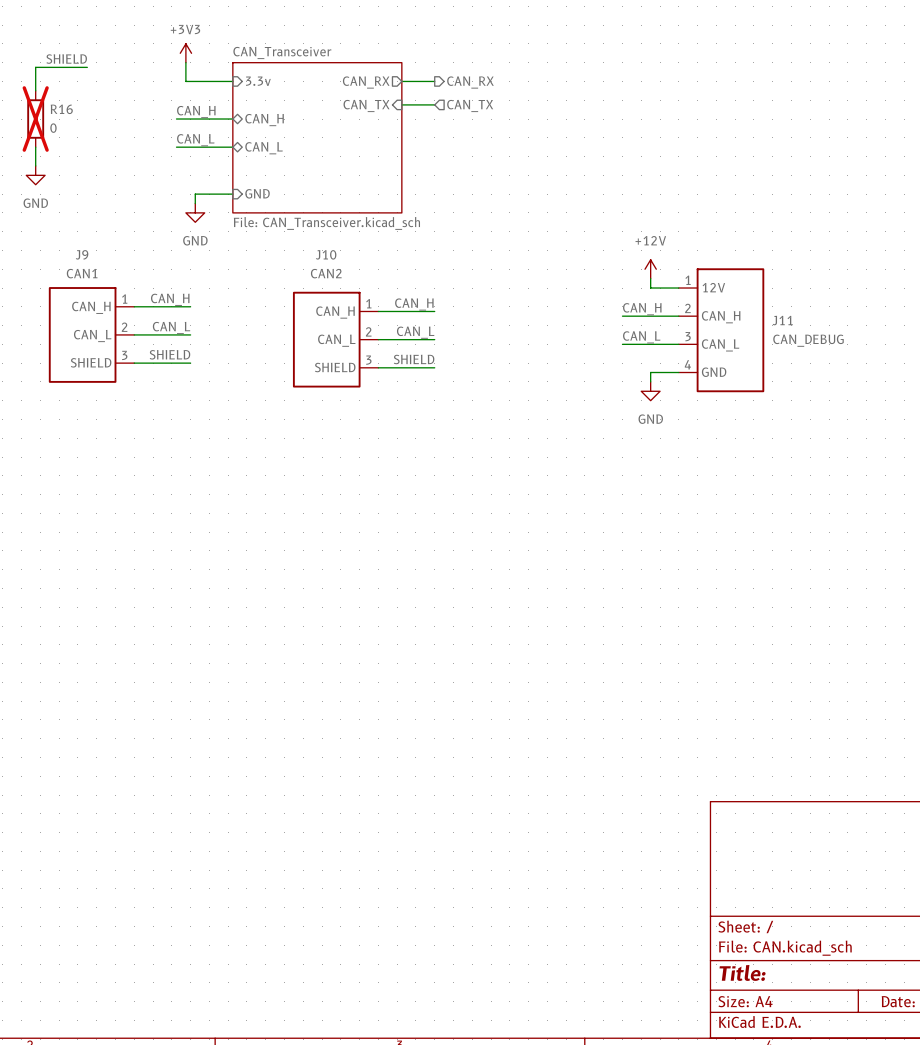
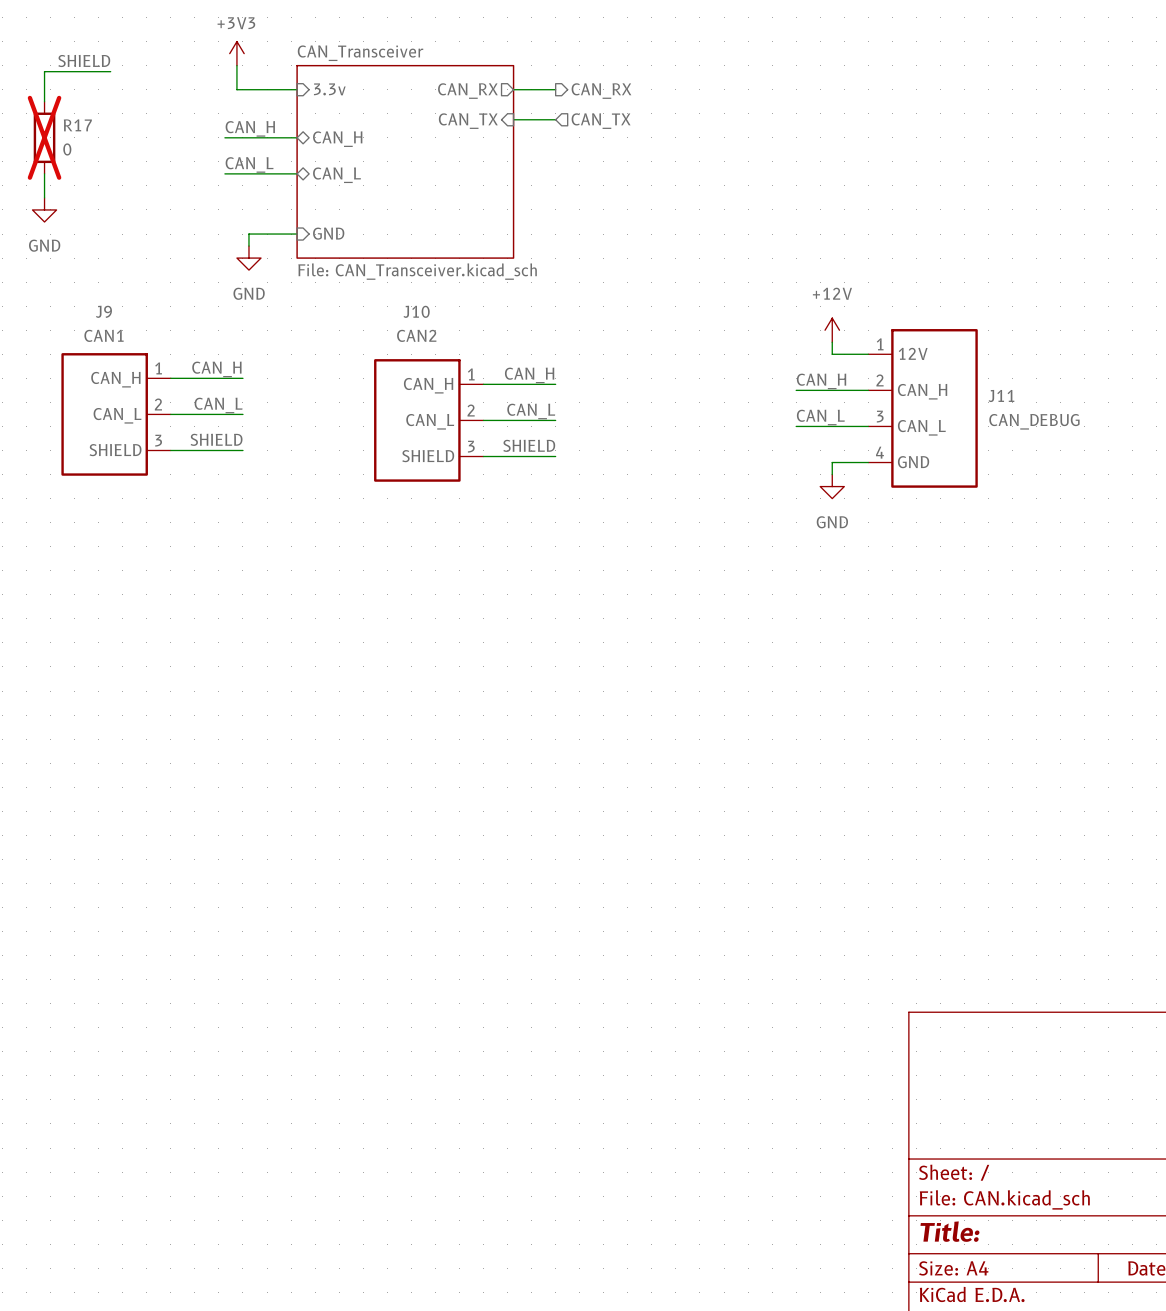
R16 name: R16 (61, 109) -> R17 (77, 125)

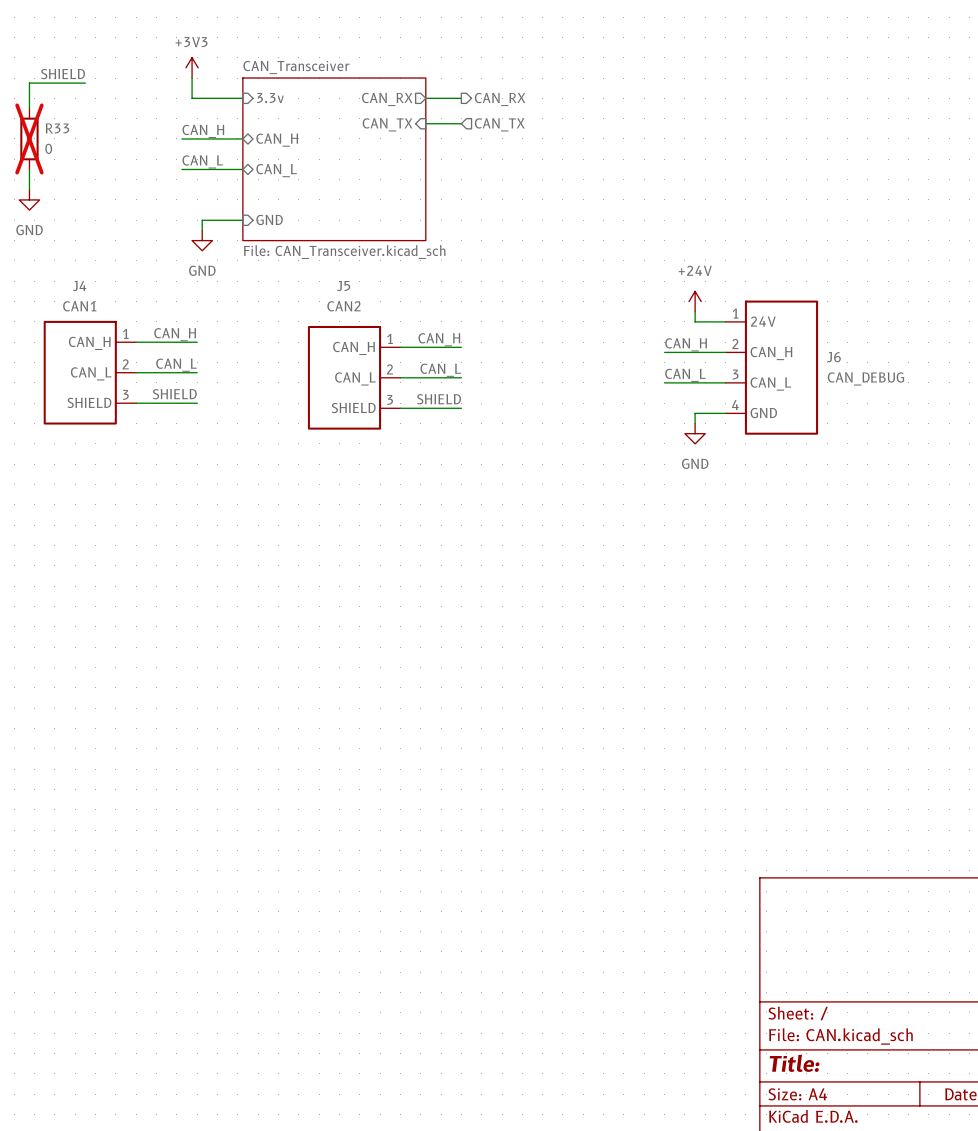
R17 name: R17 (77, 125) -> R33 (57, 128)
J9 name: J9 (103, 311) -> J4 (79, 286)
J10 name: J10 (416, 311) -> J5 (343, 286)
power symbol: +12V (832, 330) -> +24V (695, 301)
J11 pin name: 12V (913, 353) -> 24V (763, 321)
J11 name: J11 (1001, 395) -> J6 (834, 357)

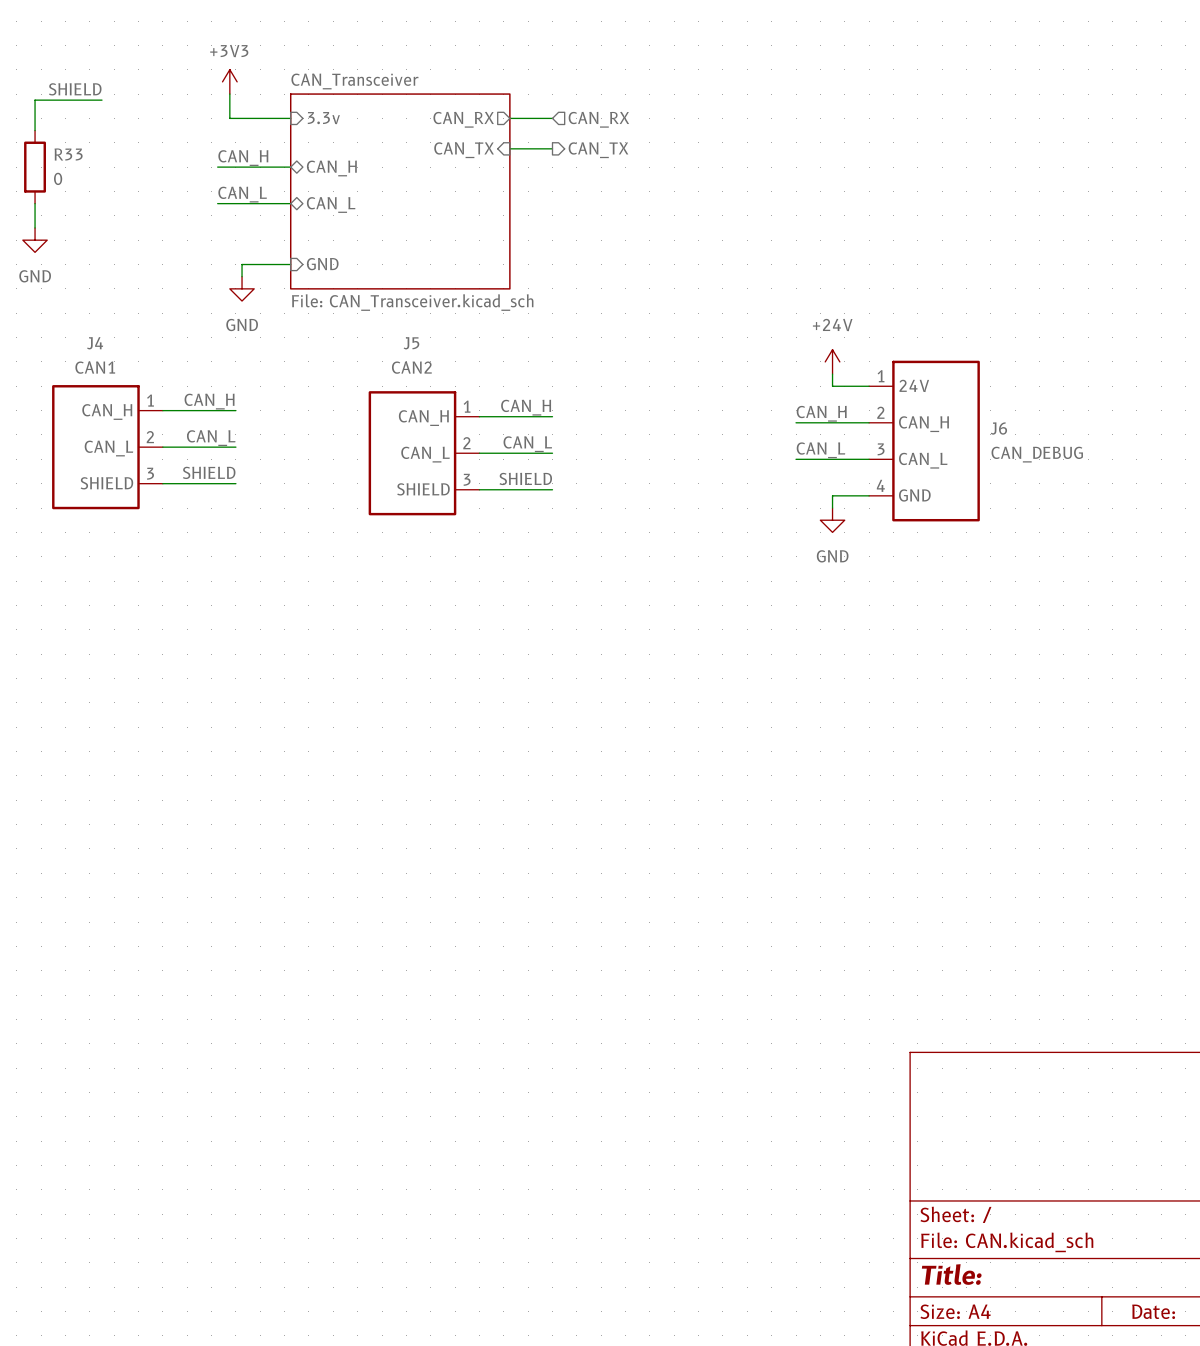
hierarchical label shape: output (500, 99) -> input (598, 119)
hierarchical label shape: input (499, 124) -> output (598, 150)
R33 do-not-place cross: (29, 138) -> none

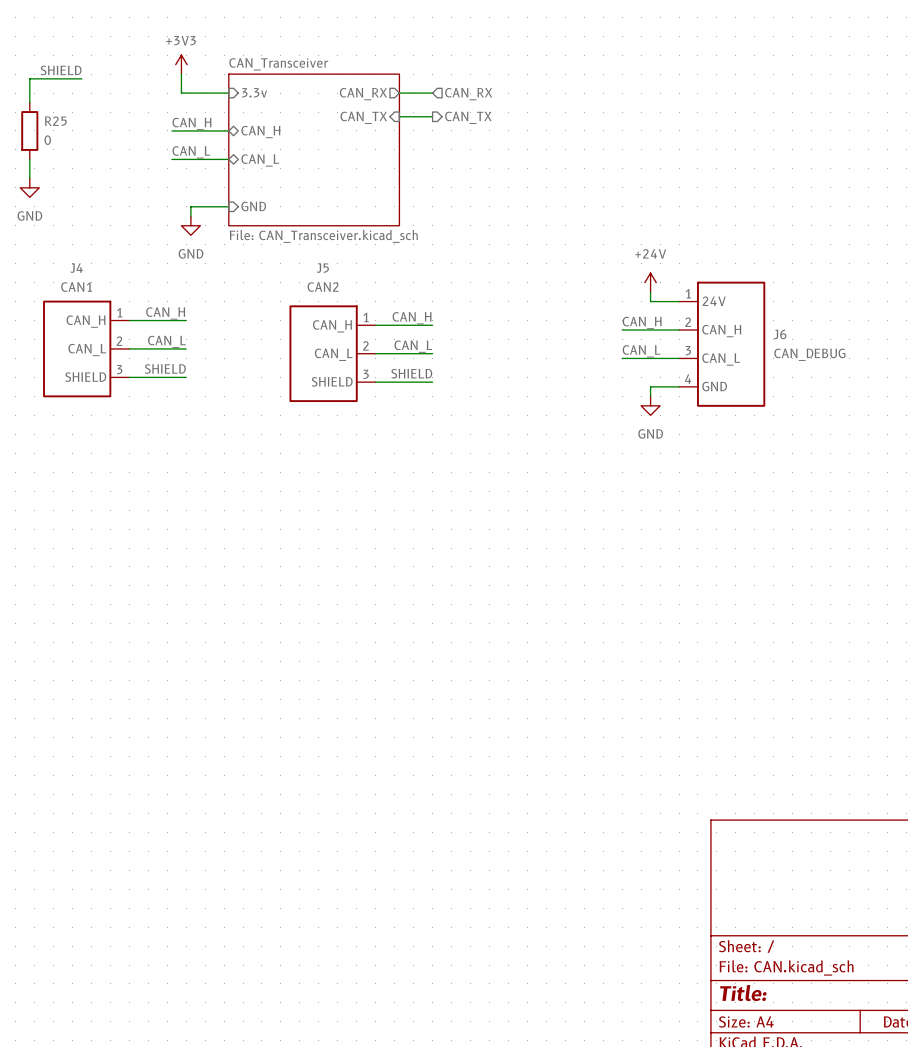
R33 name: R33 (68, 154) -> R25 (55, 121)

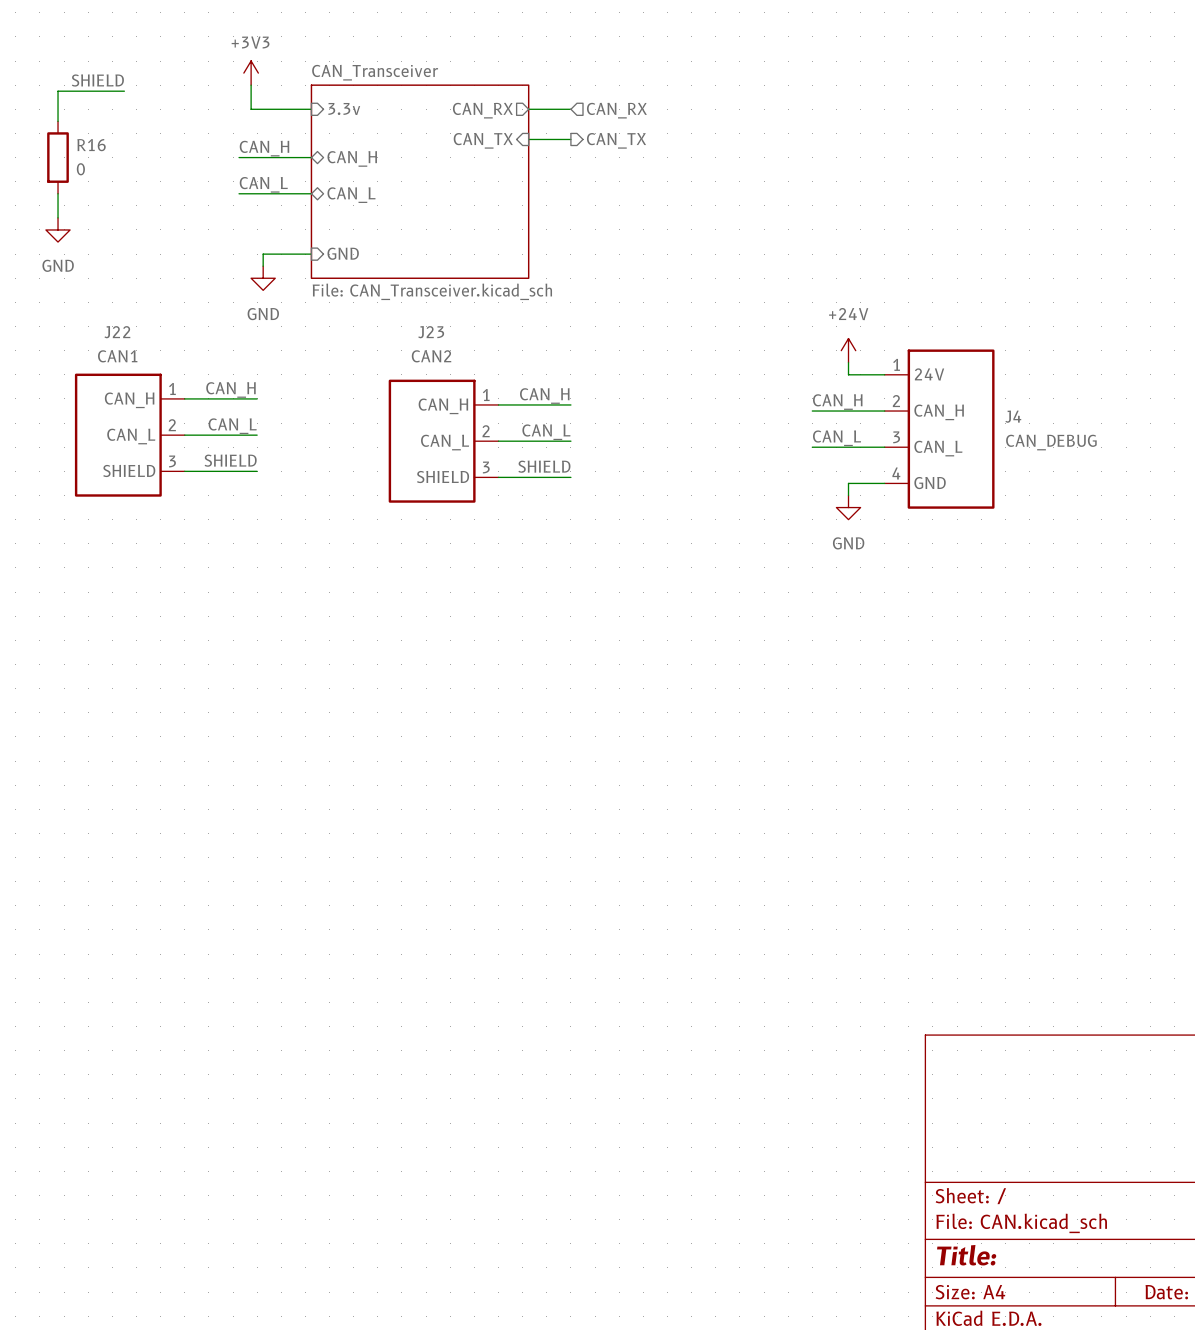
R25 name: R25 (55, 121) -> R16 (91, 145)
J4 name: J4 (76, 268) -> J22 (117, 332)
J5 name: J5 (322, 268) -> J23 (431, 332)
J6 name: J6 (780, 334) -> J4 (1013, 416)

